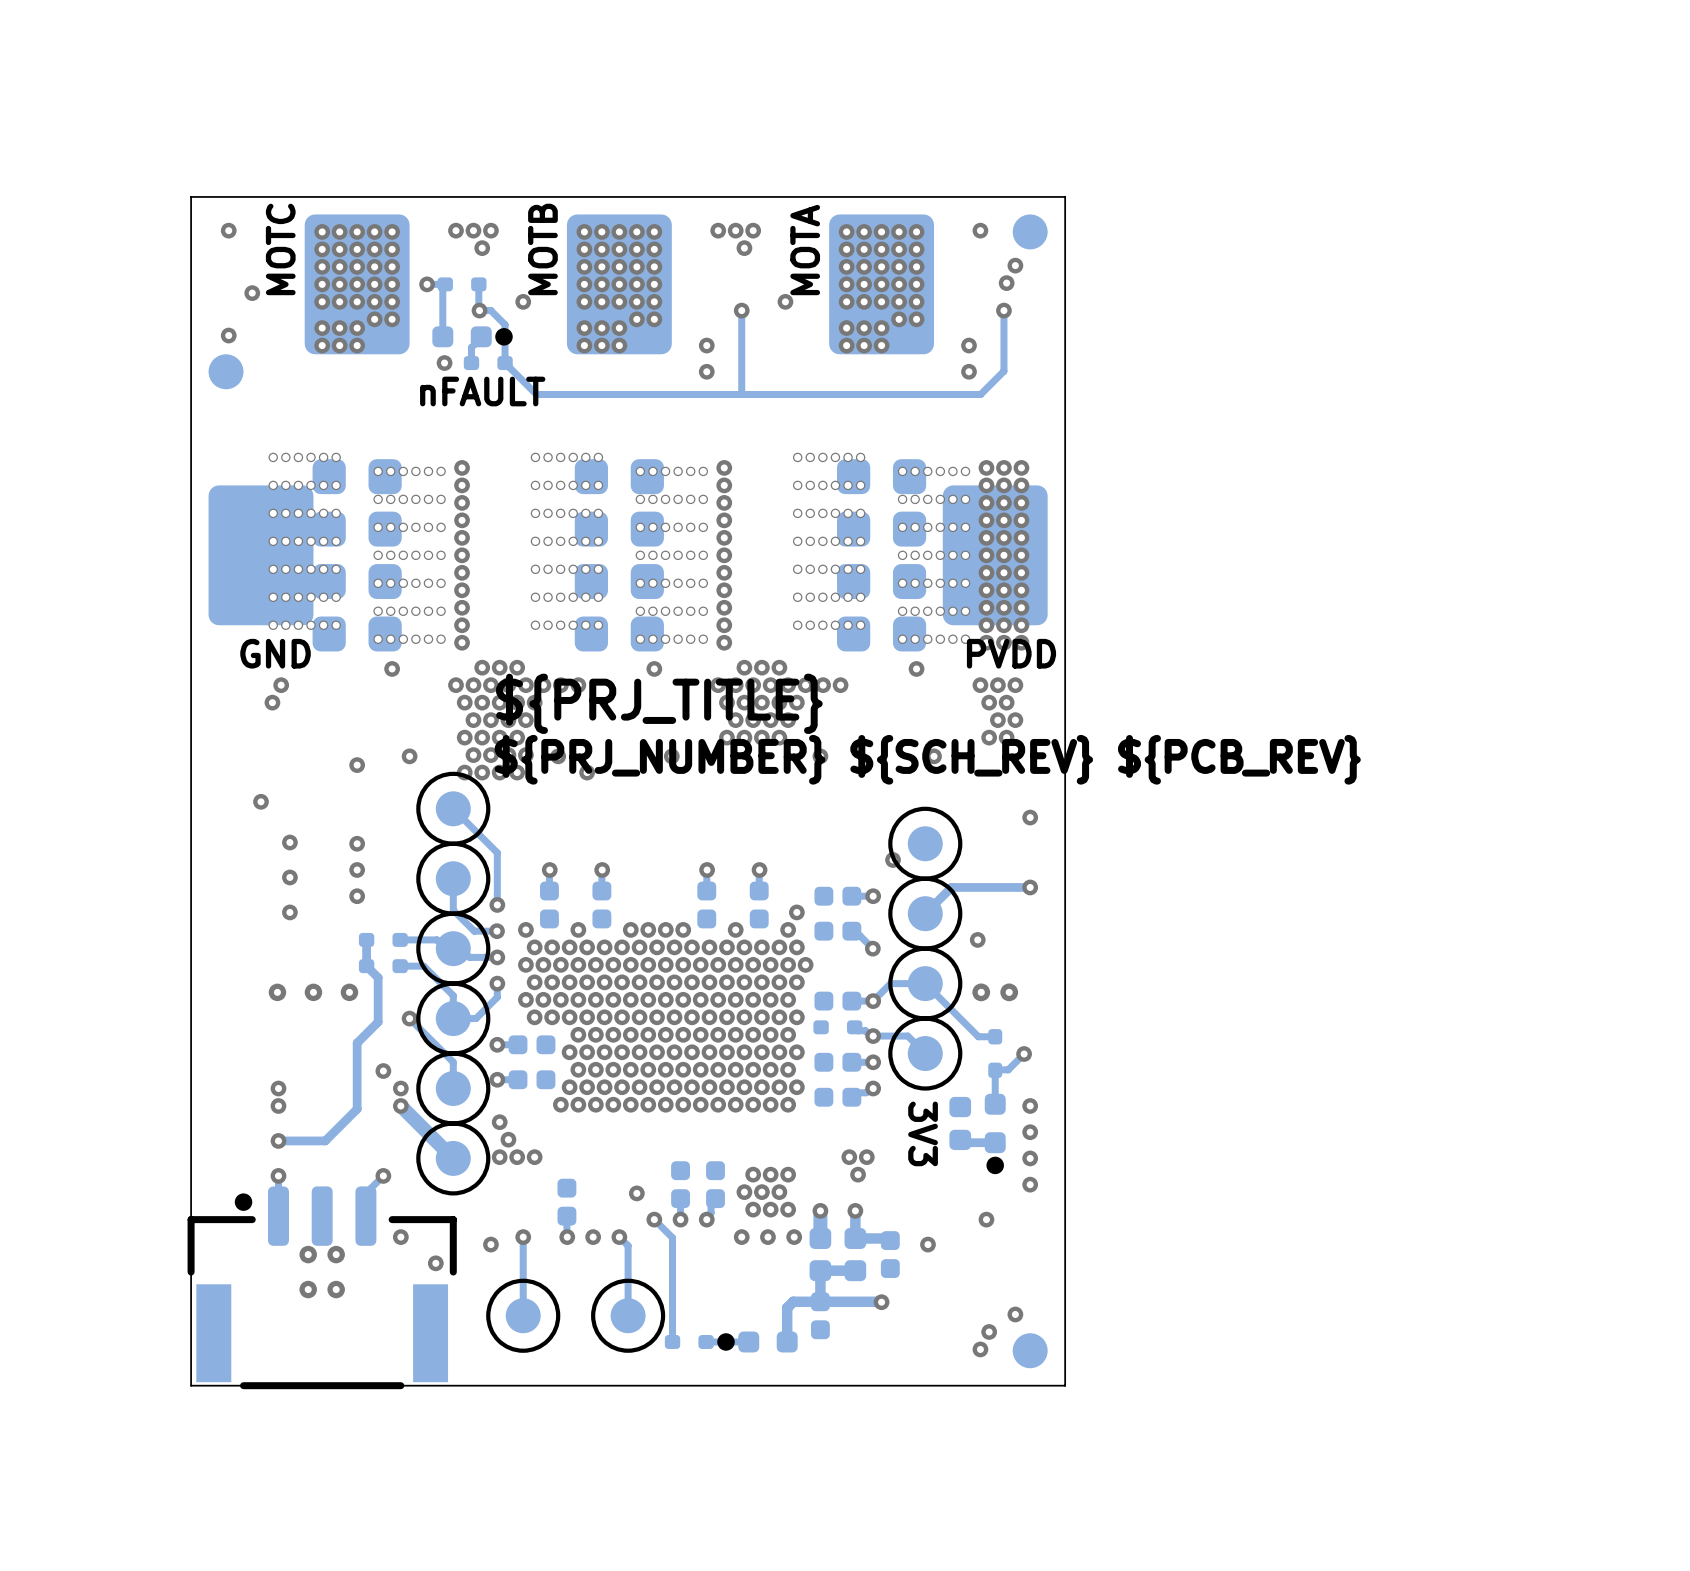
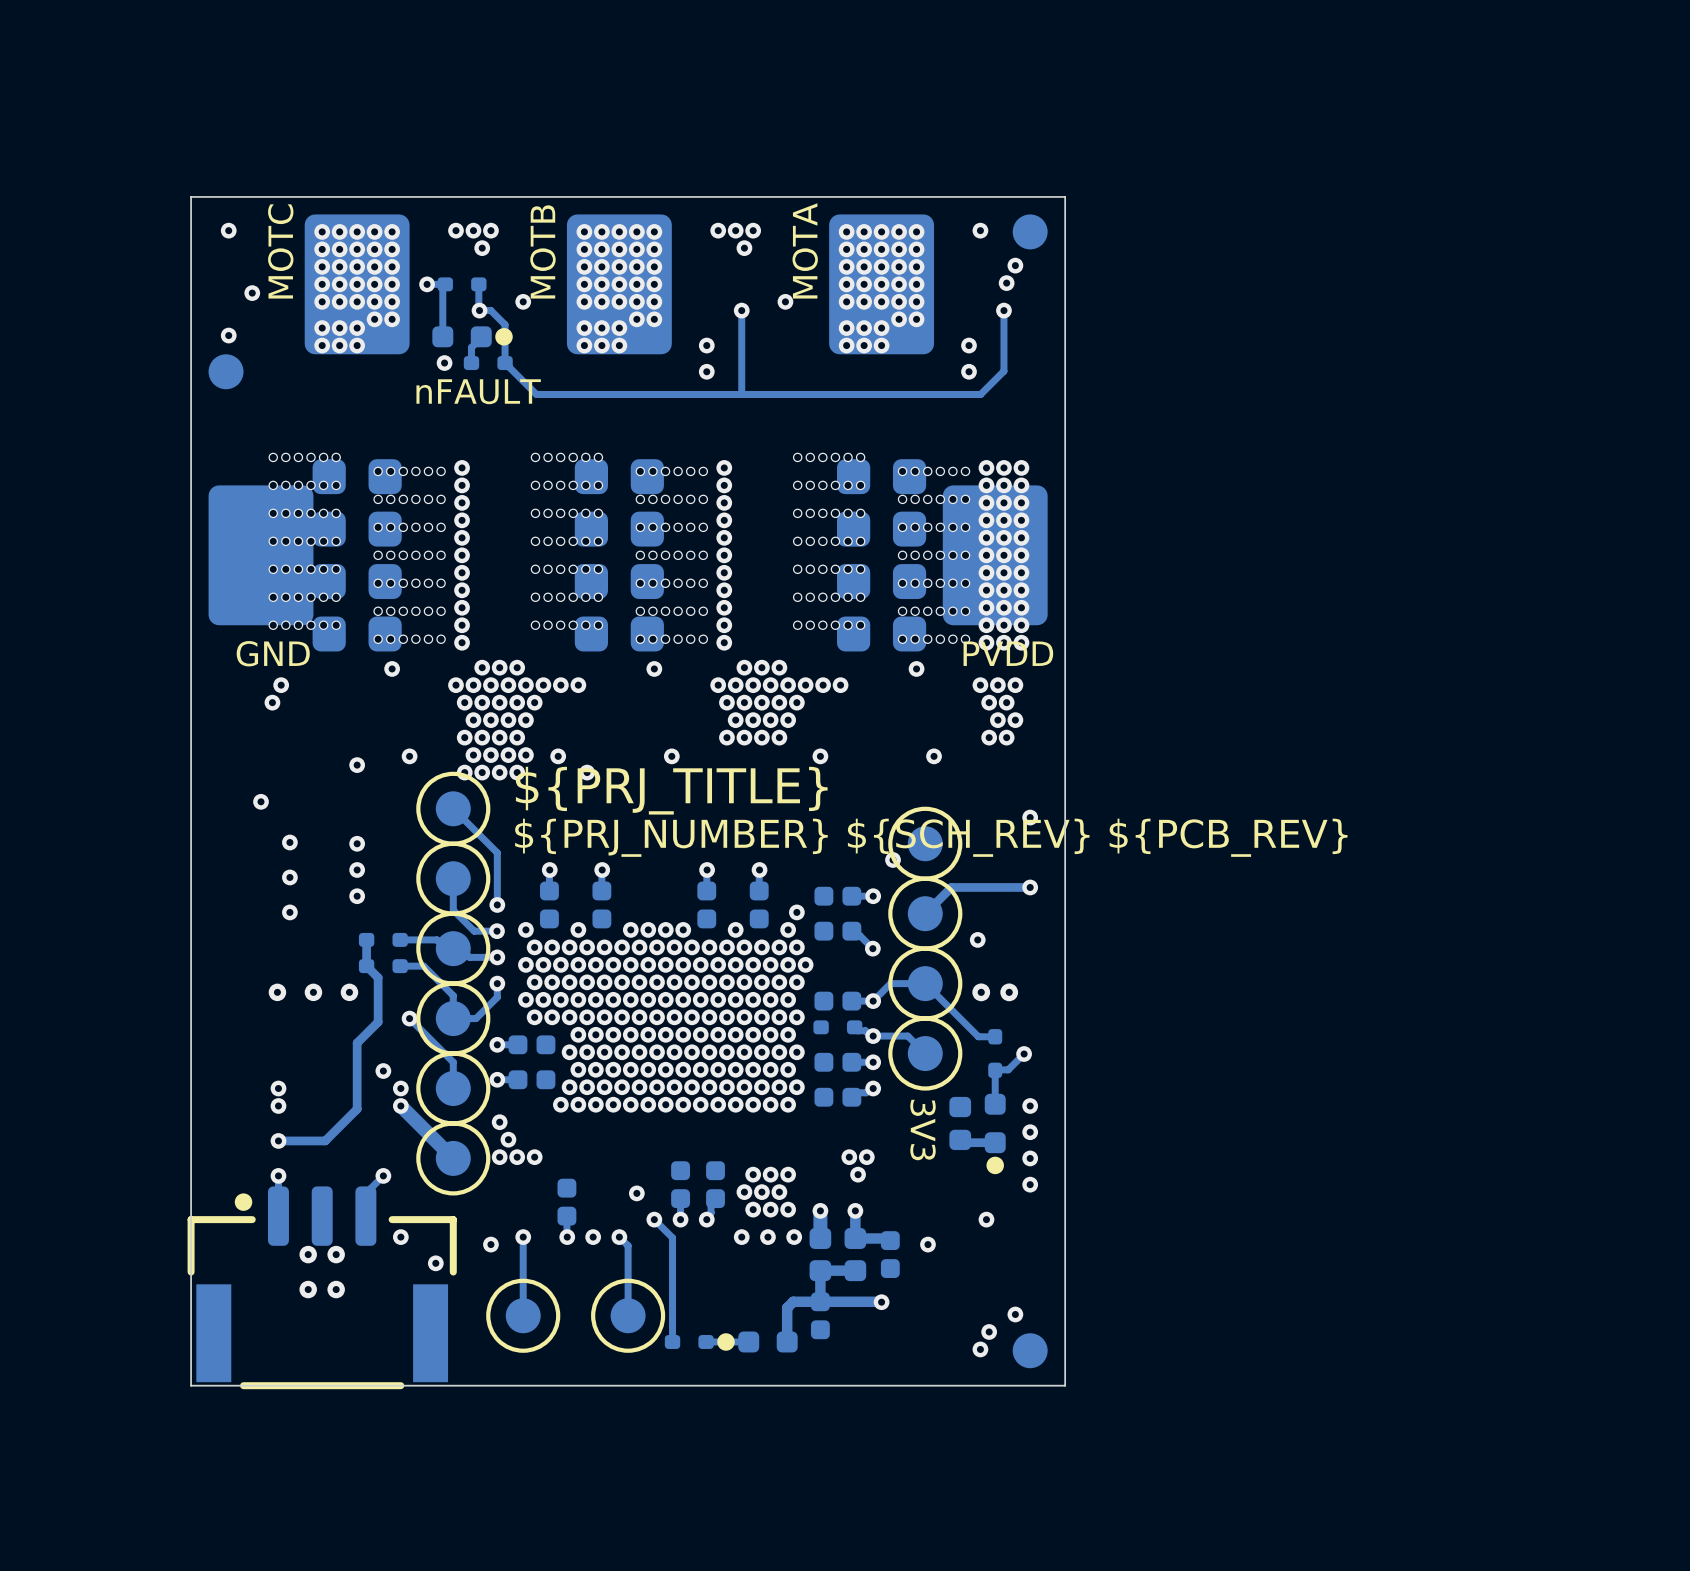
text position: ${PRJ_TITLE} (659, 703) -> ${PRJ_TITLE} (671, 790)
text position: ${PRJ_NUMBER} ${SCH_REV} ${PCB_REV} (927, 759) -> ${PRJ_NUMBER} ${SCH_REV} ${PCB_REV} (931, 837)

